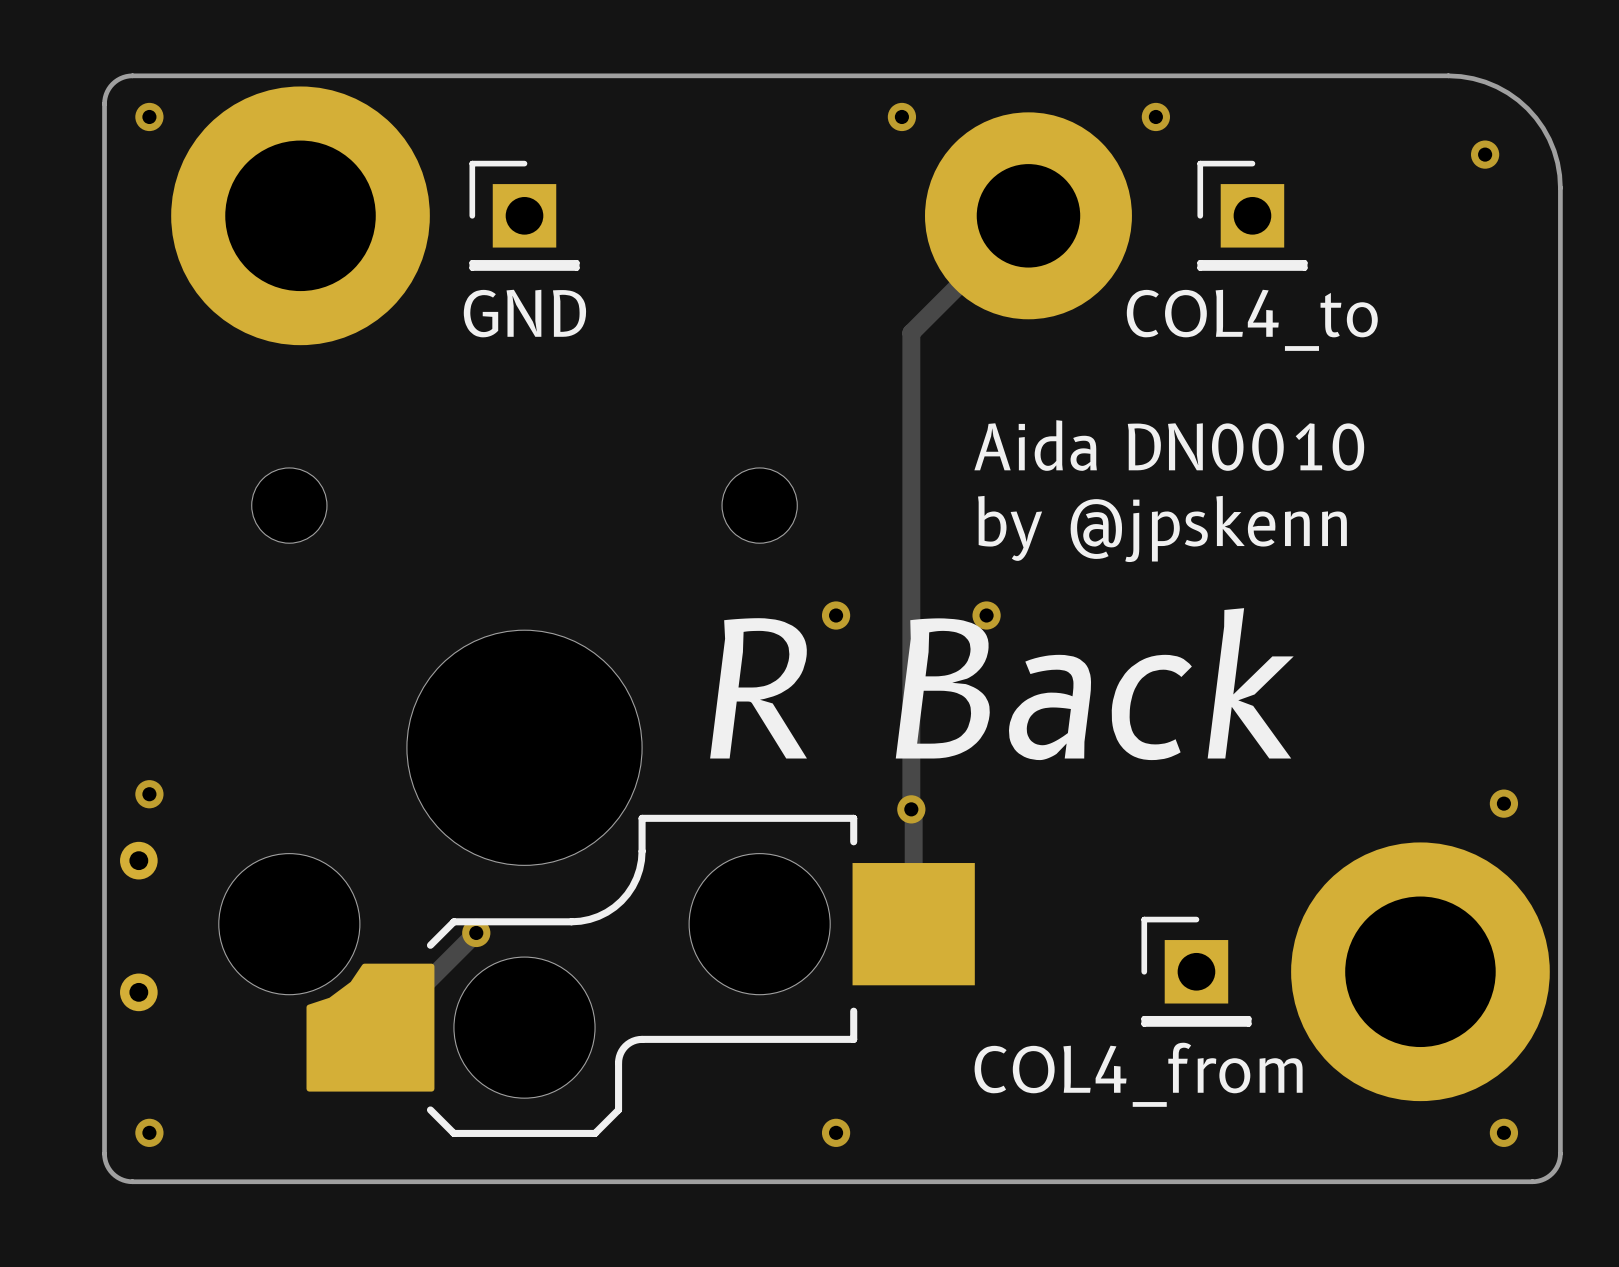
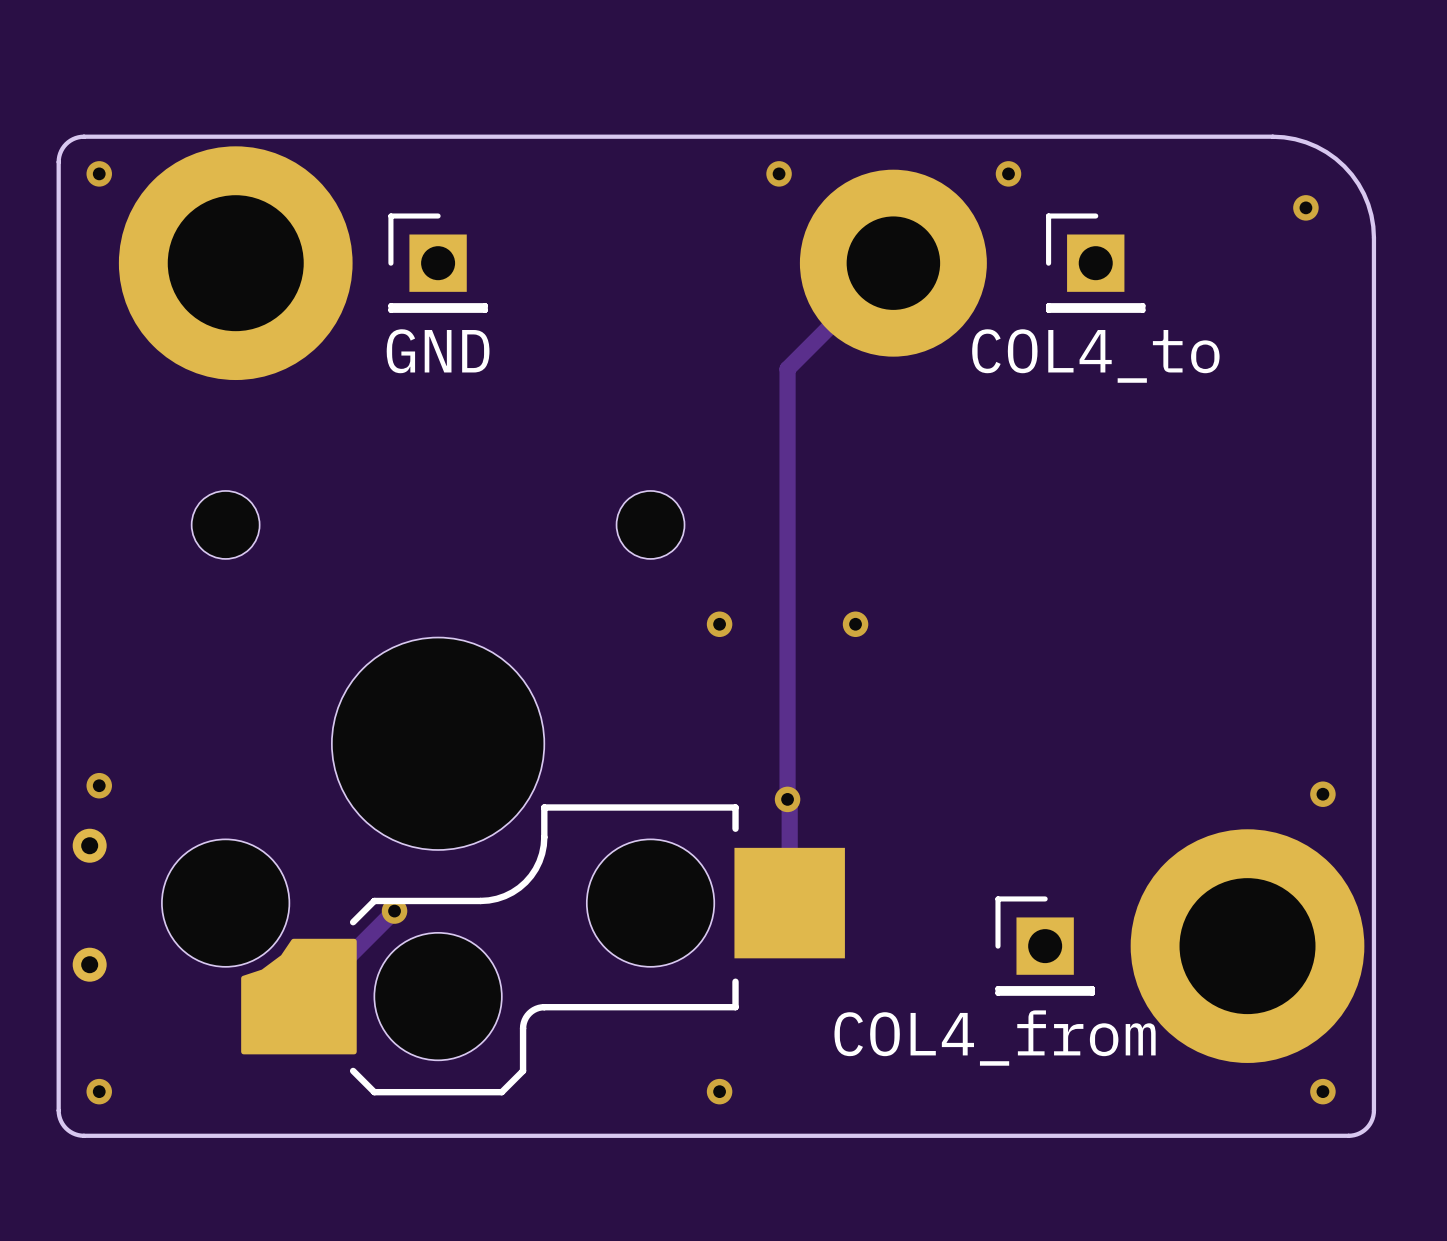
text: Aida DN0010 (1169, 445) -> none
text: by @jpskenn (1162, 528) -> none
text: R Back (1001, 684) -> none

